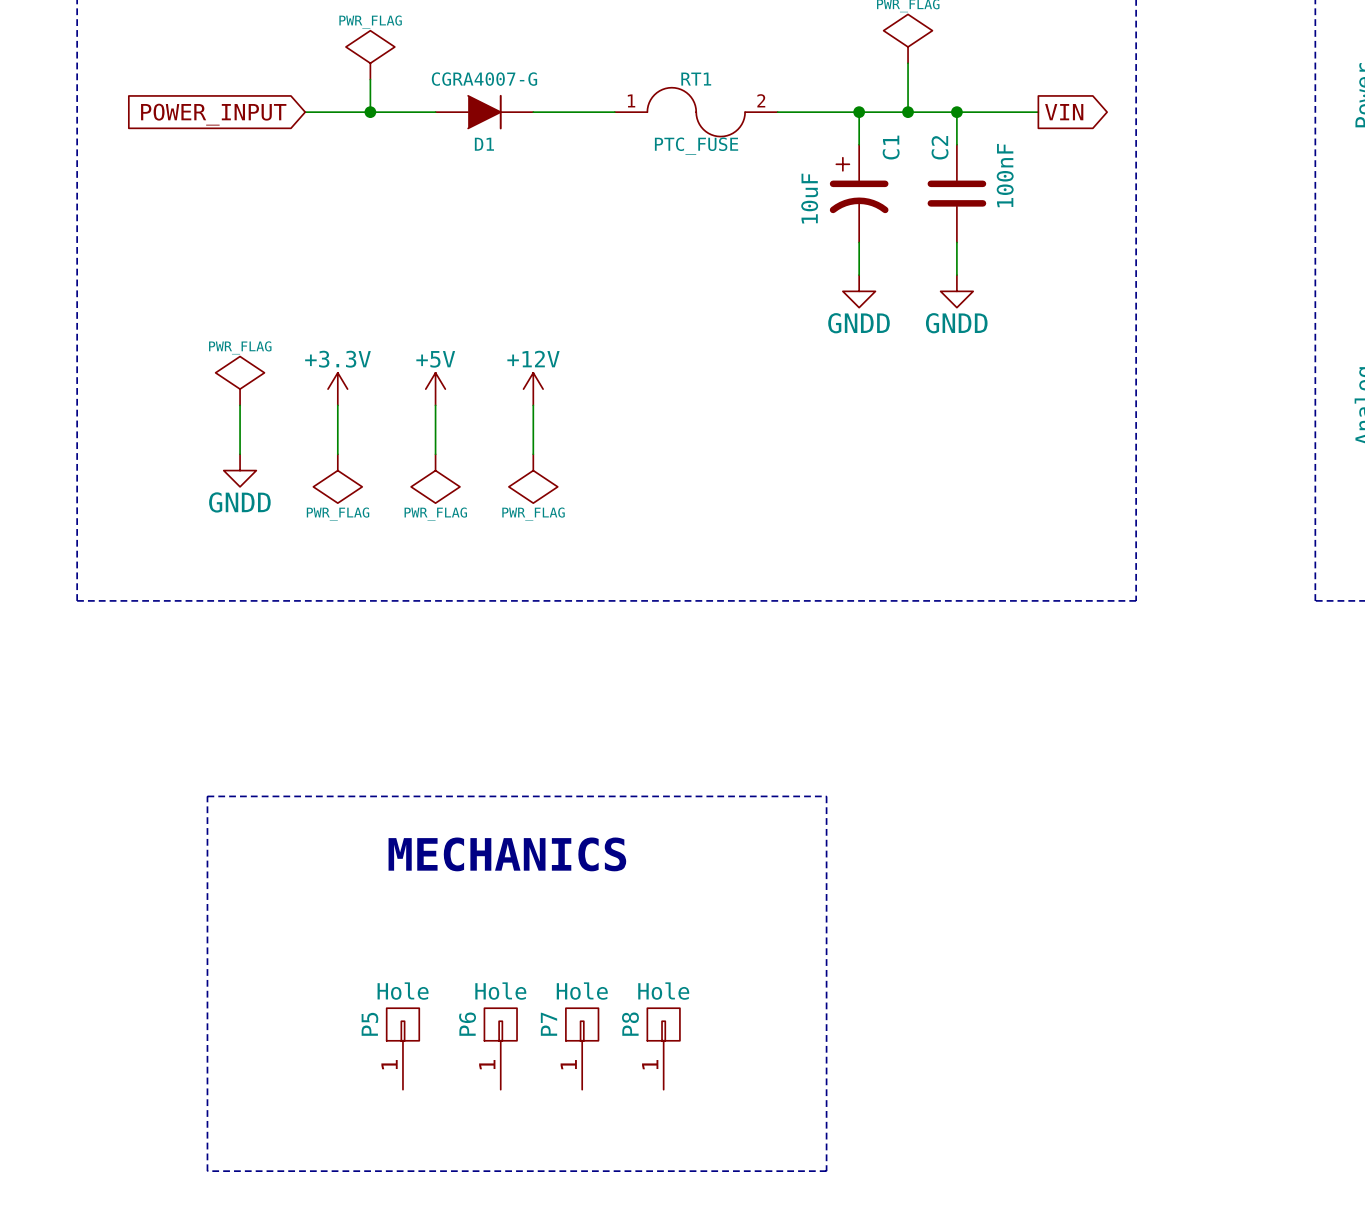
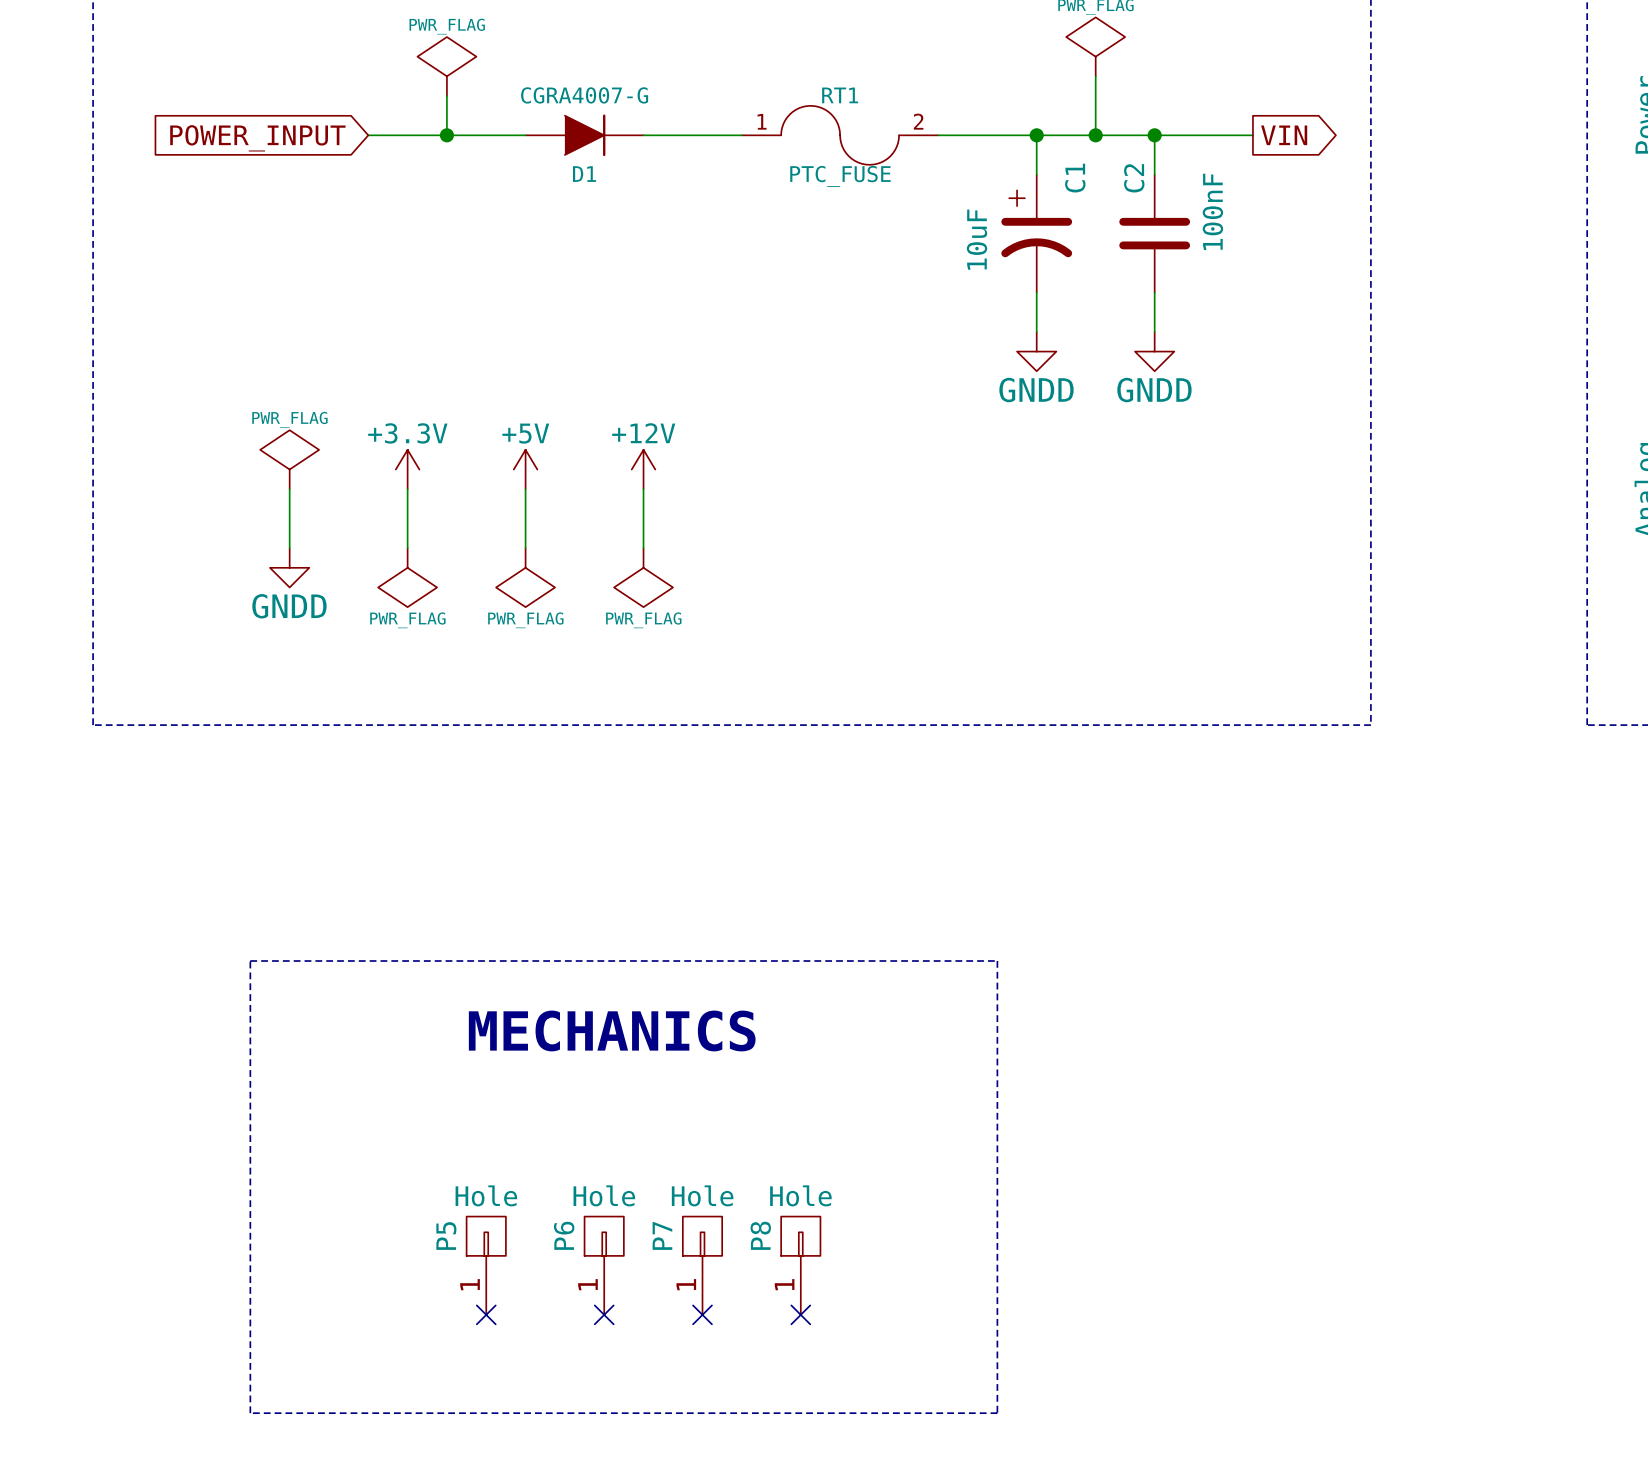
no-connect mark: none -> (486, 1314)
no-connect mark: none -> (604, 1314)
no-connect mark: none -> (702, 1314)
no-connect mark: none -> (800, 1314)

